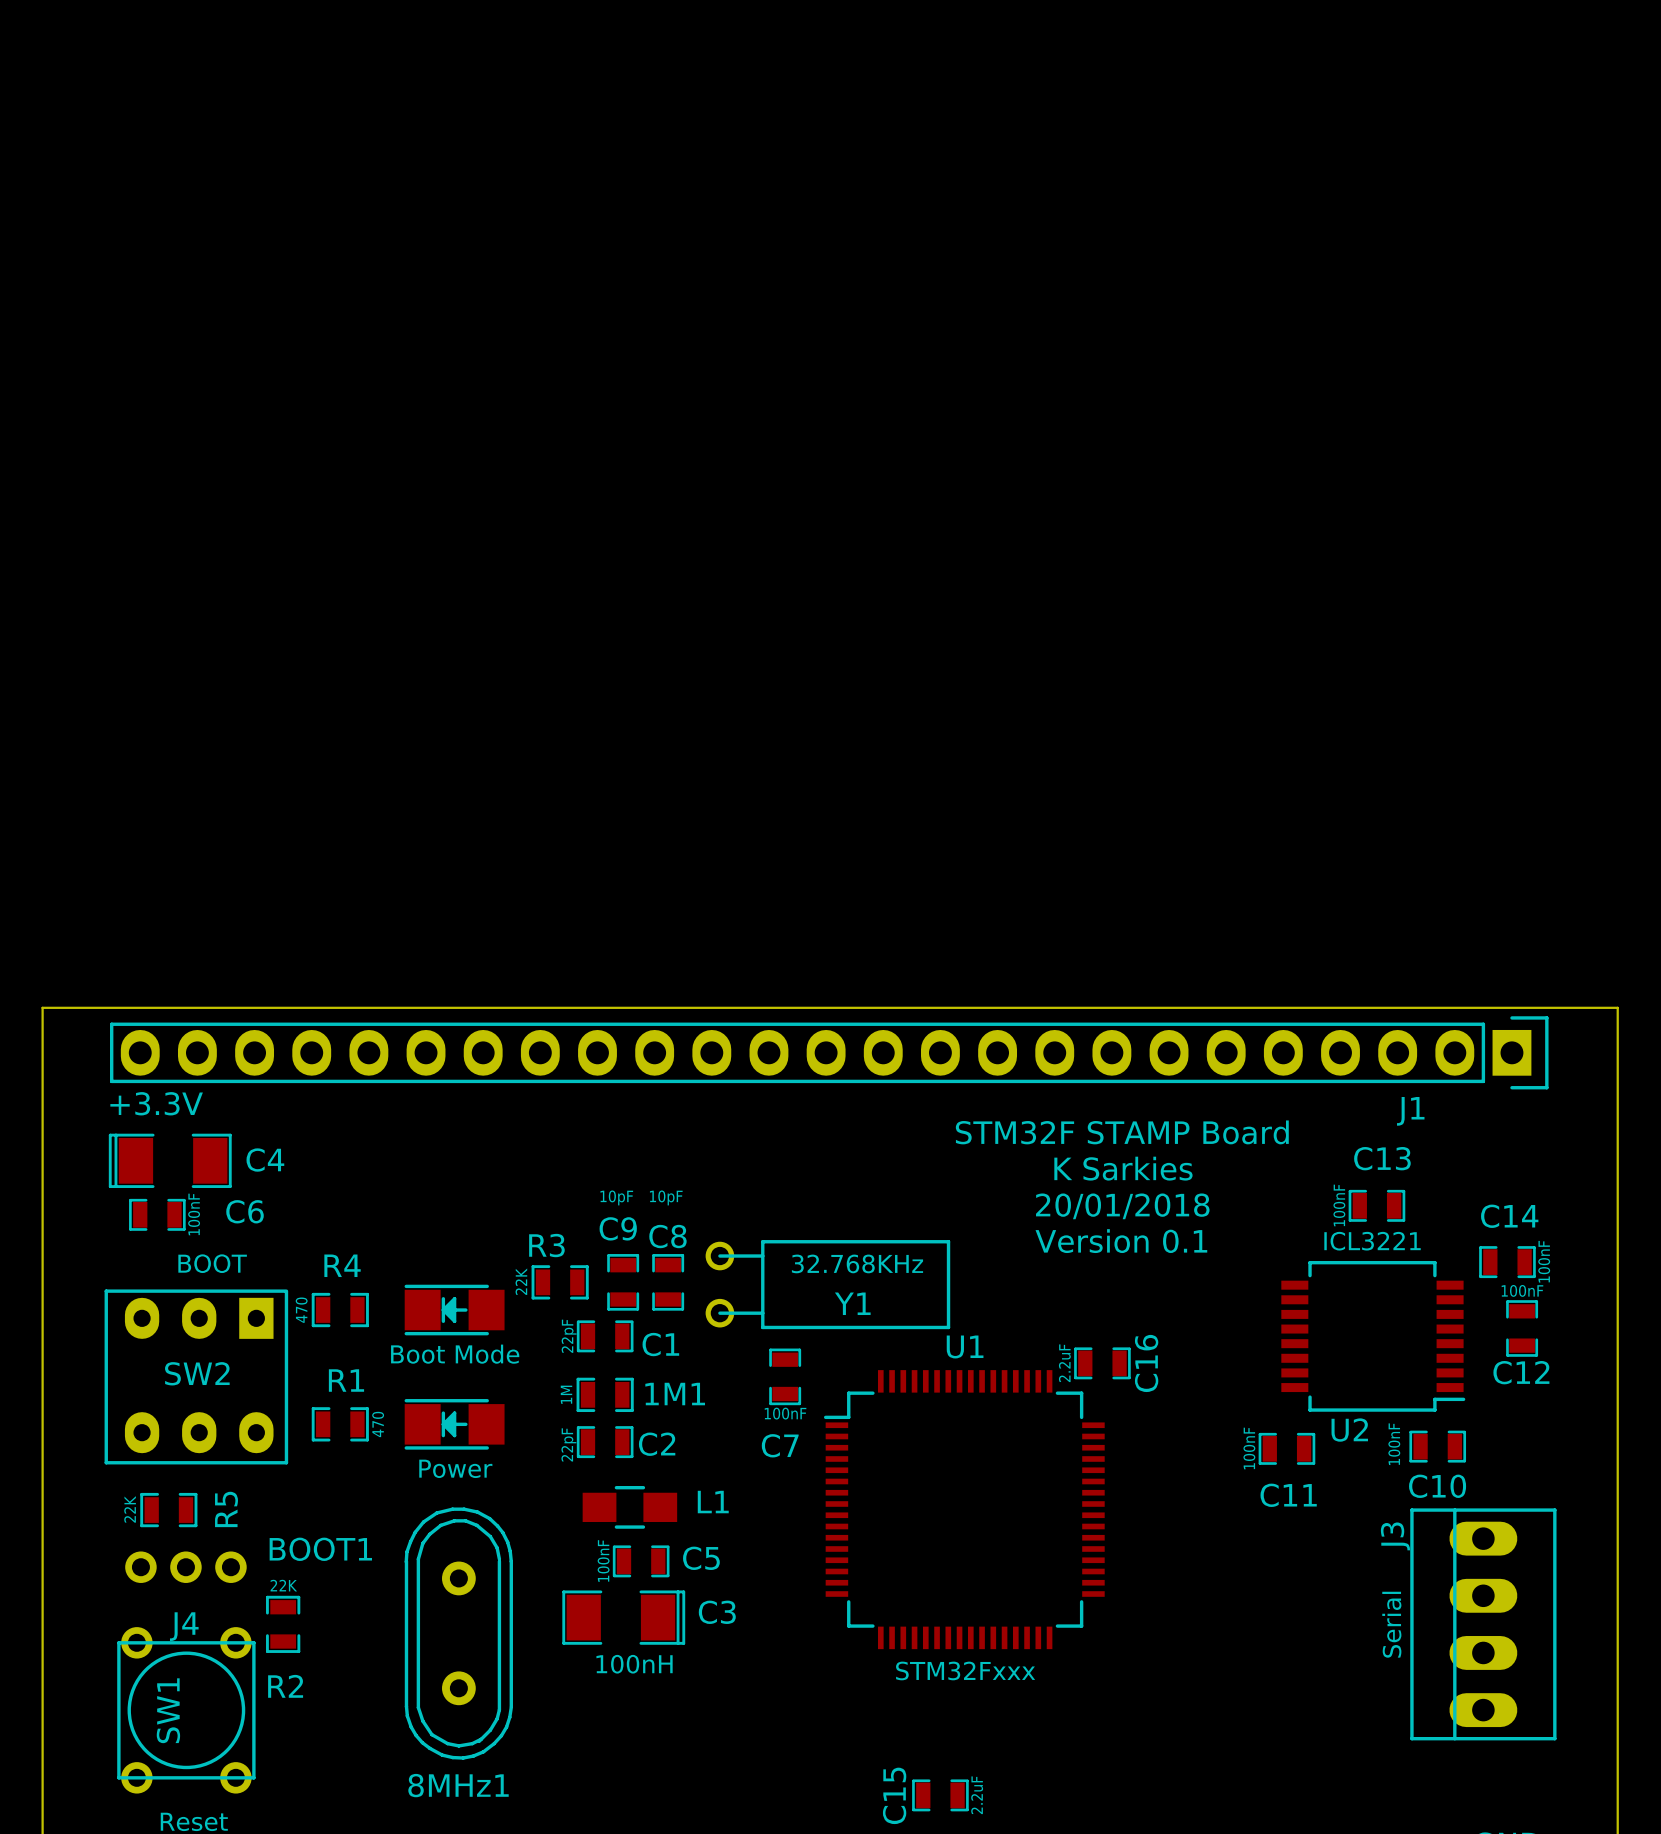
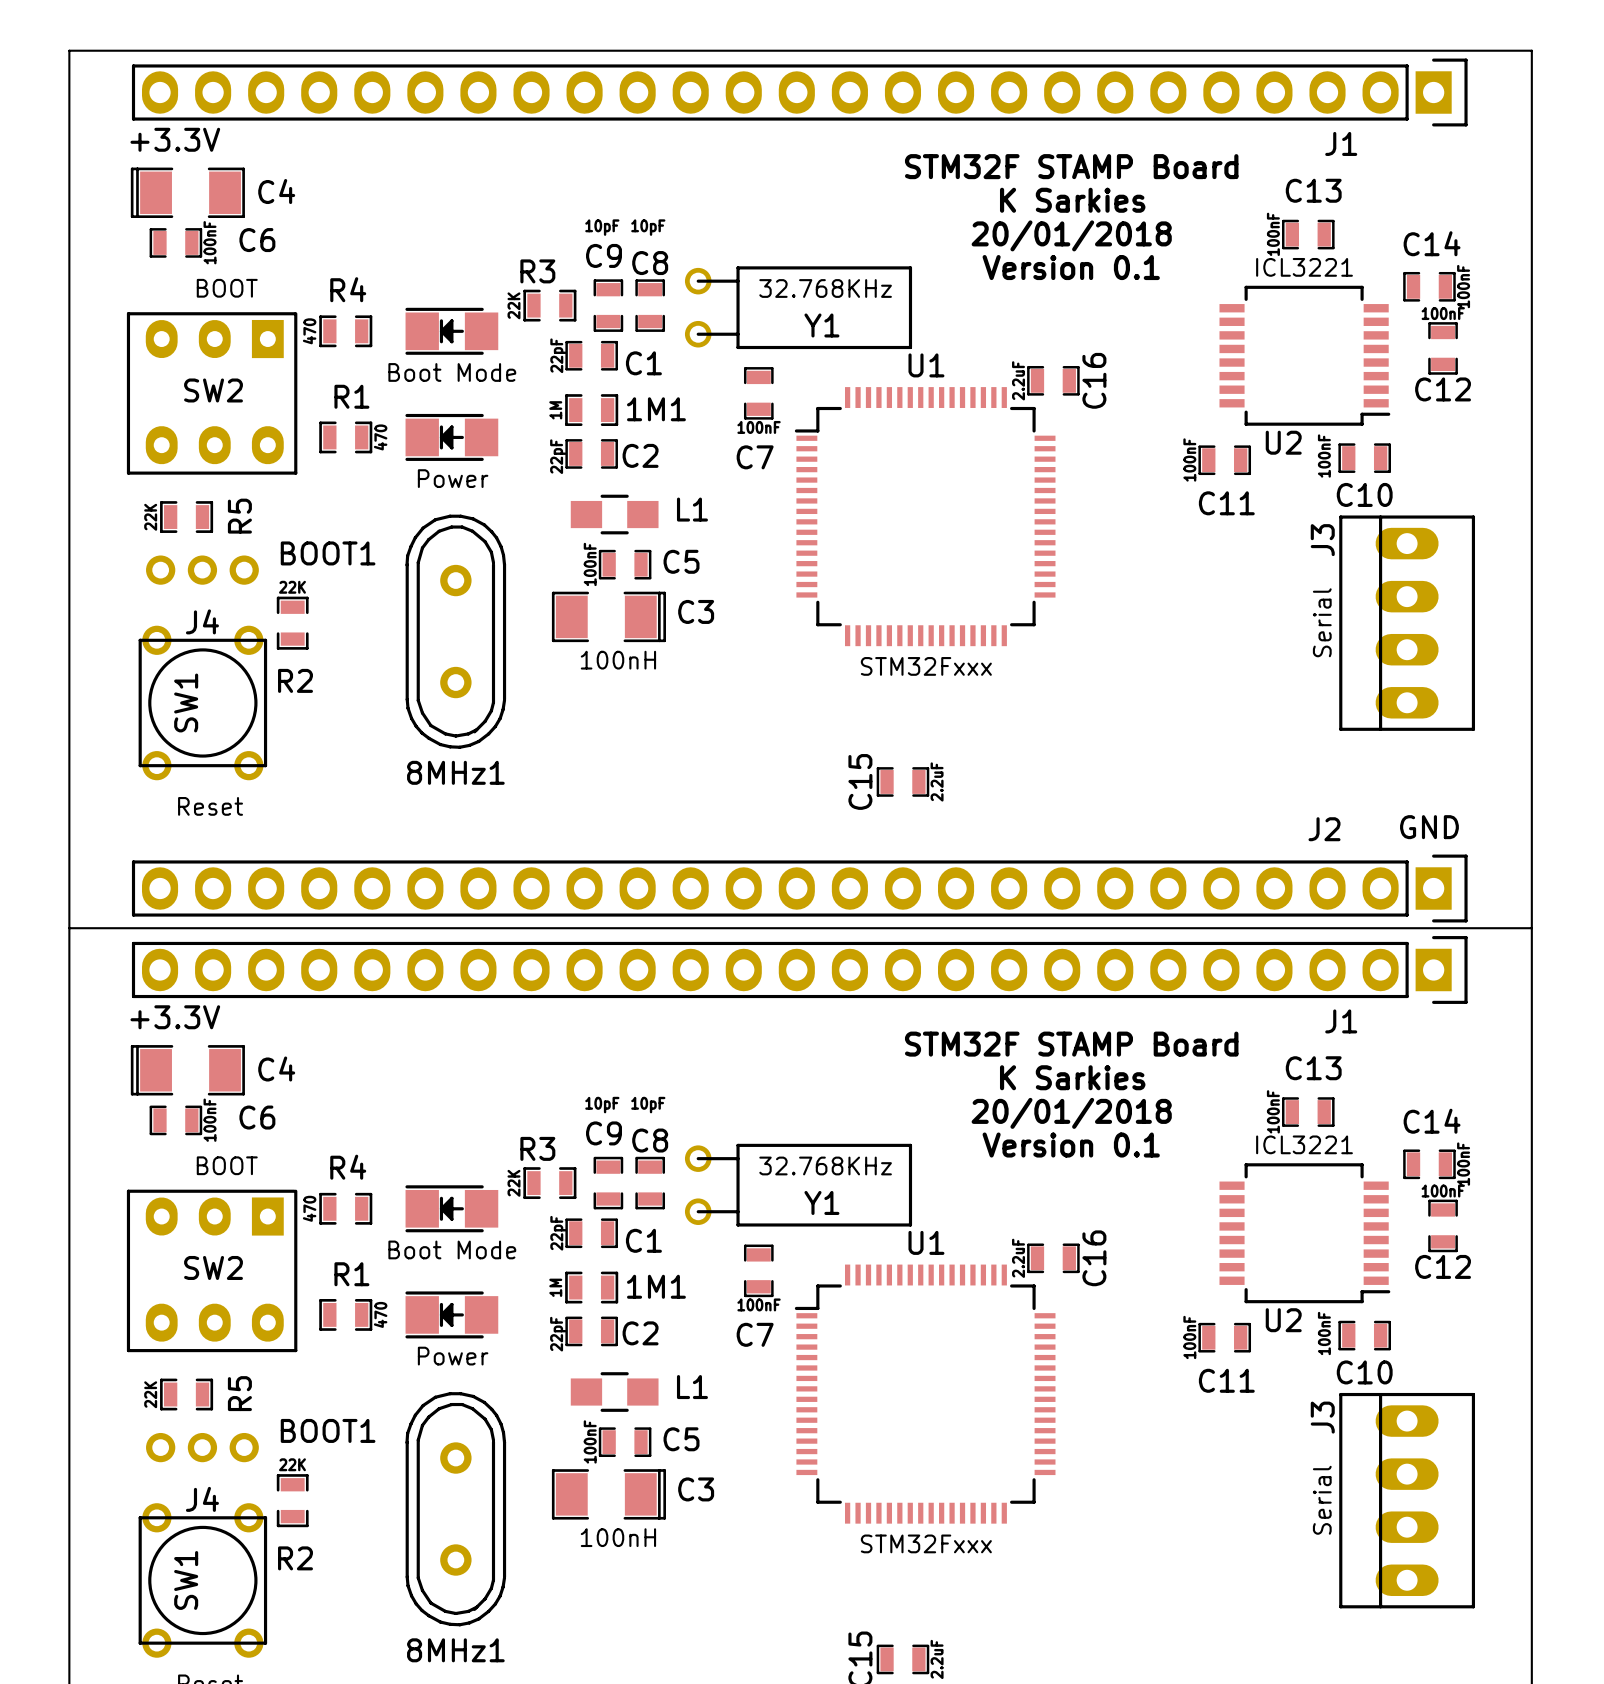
J1: none -> +3.3V (799, 92)
text: none -> STM32F STAMP Board (1071, 166)
C4: none -> (187, 192)
text: none -> K Sarkies (1072, 200)
C13: none -> 100nF (1308, 234)
text: none -> 20/01/2018 (1071, 235)
C6: none -> 100nF (175, 242)
text: none -> Version 0.1 (1071, 267)
C14: none -> 100nF (1429, 286)
R3: none -> 22K (549, 305)
C9: none -> 10pF (608, 305)
C8: none -> 10pF (650, 305)
Y1: none -> 32.768KHz (798, 307)
R4: none -> 470 (345, 331)
part: none -> Boot Mode (451, 331)
C12: none -> 100nF (1443, 348)
C1: none -> 22pF (591, 355)
U2: none -> ICL3221 (1304, 355)
C16: none -> 2.2uF (1053, 380)
SW2: none -> BOOT (212, 393)
C7: none -> 100nF (758, 393)
1M1: none -> 1M (591, 410)
R1: none -> 470 (345, 437)
part: none -> Power (451, 437)
C2: none -> 22pF (591, 453)
C10: none -> 100nF (1364, 458)
C11: none -> 100nF (1224, 460)
L1: none -> 100nH (614, 514)
U1: none -> STM32Fxxx (925, 516)
R5: none -> 22K (186, 517)
C5: none -> 100nF (625, 564)
J4: none -> BOOT1 (202, 570)
C3: none -> (608, 616)
R2: none -> 22K (292, 623)
J3: none -> Serial (1407, 623)
8MHz1: none -> (455, 631)
SW1: none -> Reset (202, 702)
C15: none -> 2.2uF (902, 781)
J2: none -> GND (799, 888)
board edge: none -> (69, 928) (69, 50) (1531, 50) (1531, 928)

